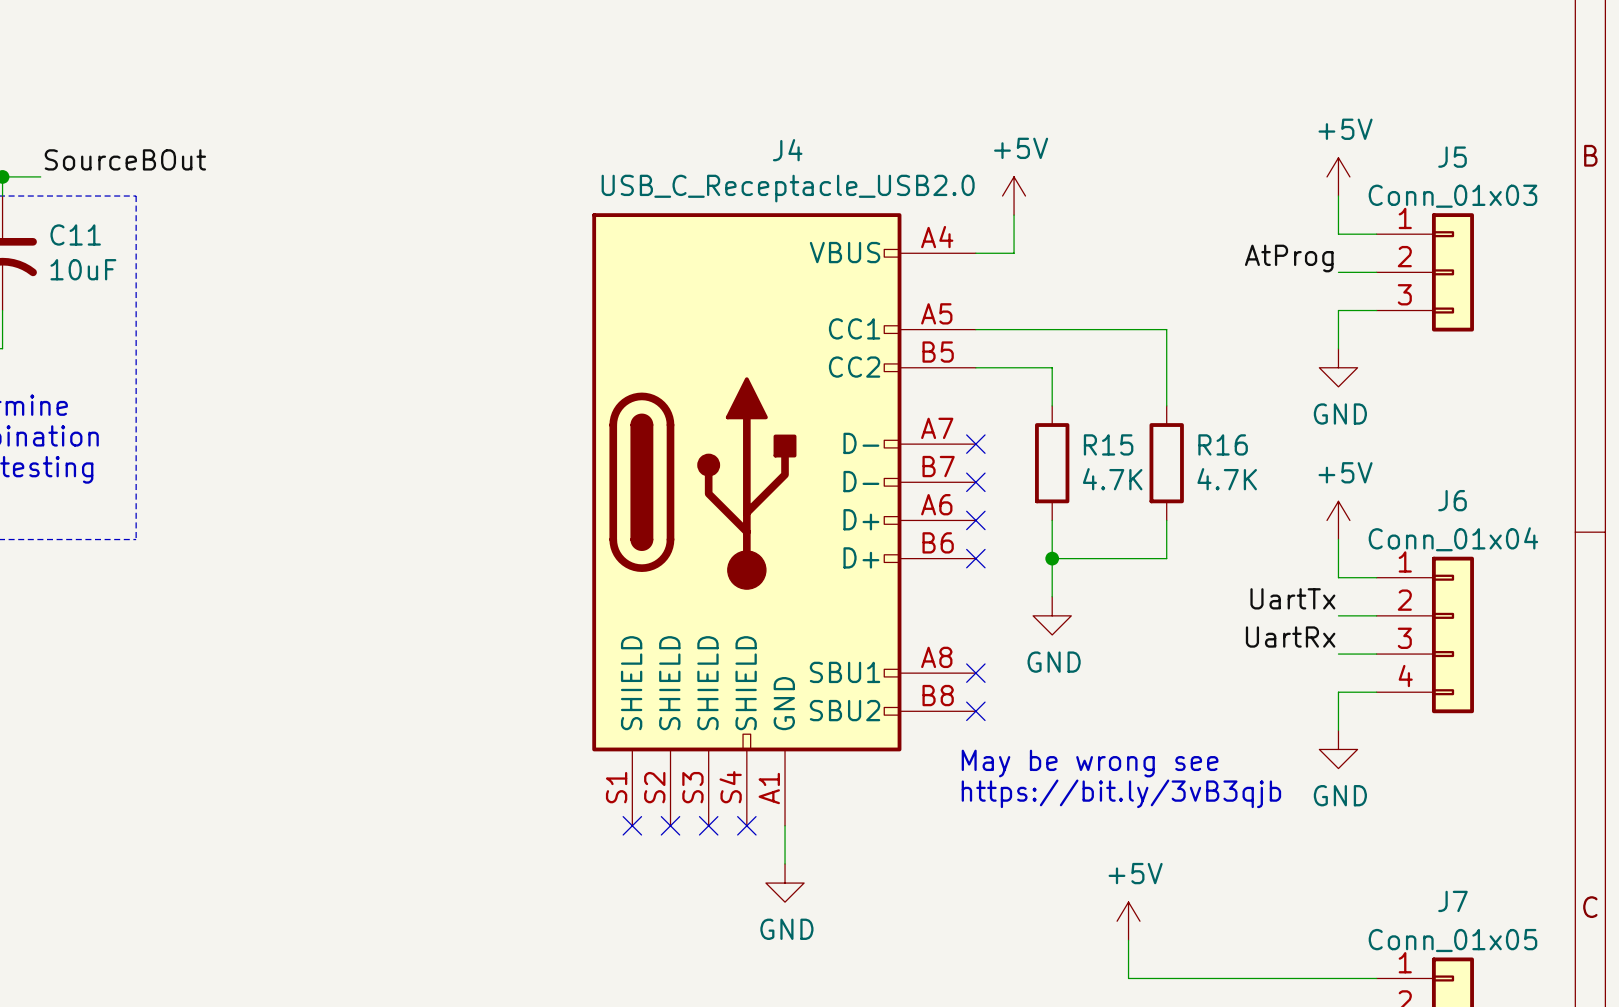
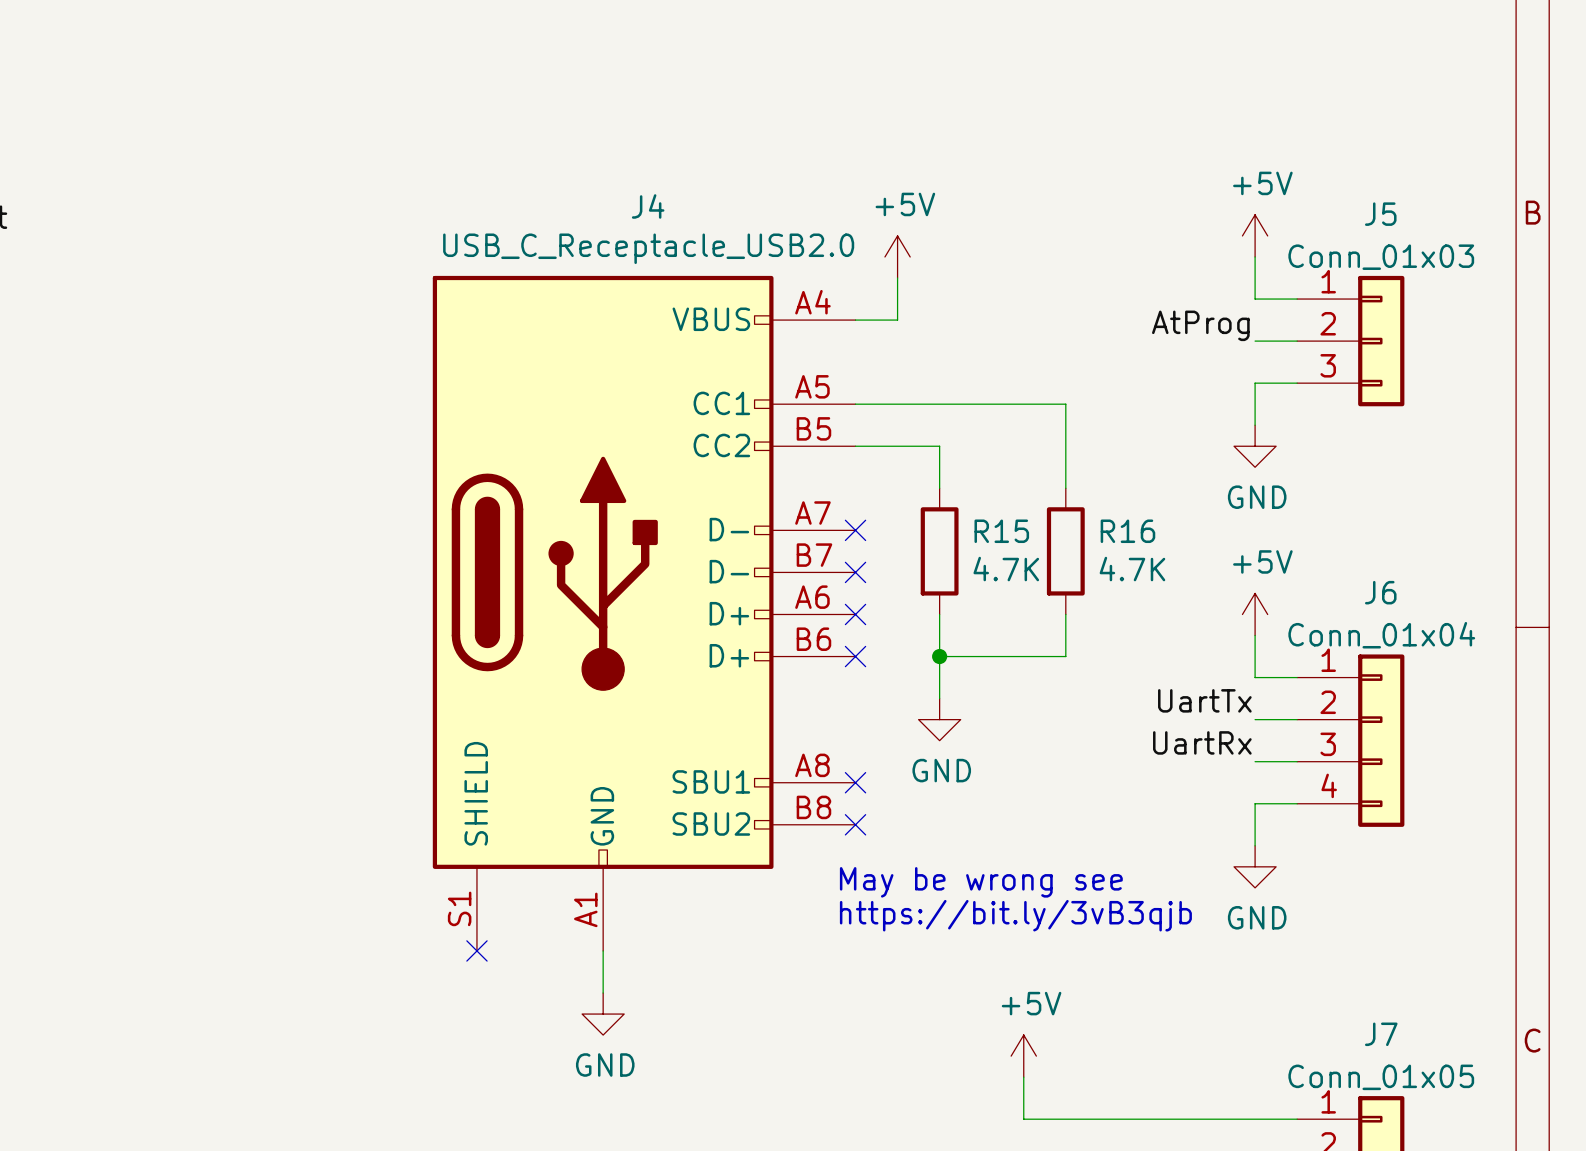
J4 symbol: [592, 213, 976, 826] -> [432, 275, 856, 951]
no-connect mark: (670, 825) -> none
no-connect mark: (708, 825) -> none
no-connect mark: (746, 825) -> none
wire: (785, 825) (785, 863) -> (603, 950) (603, 993)
power symbol position: GND (785, 883) -> GND (603, 1014)

